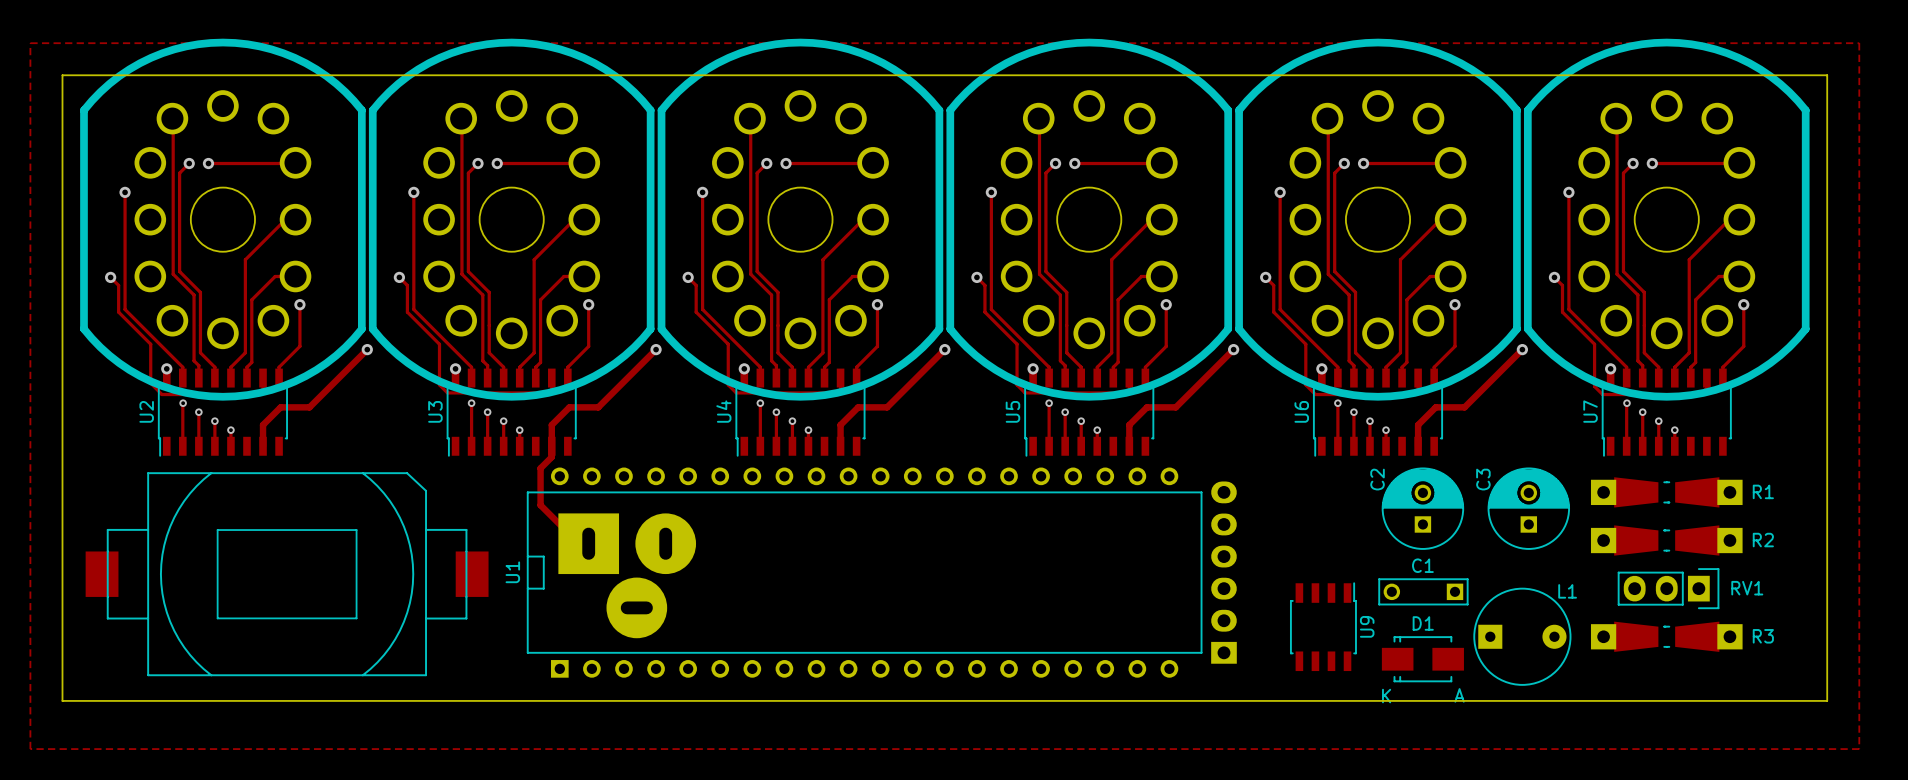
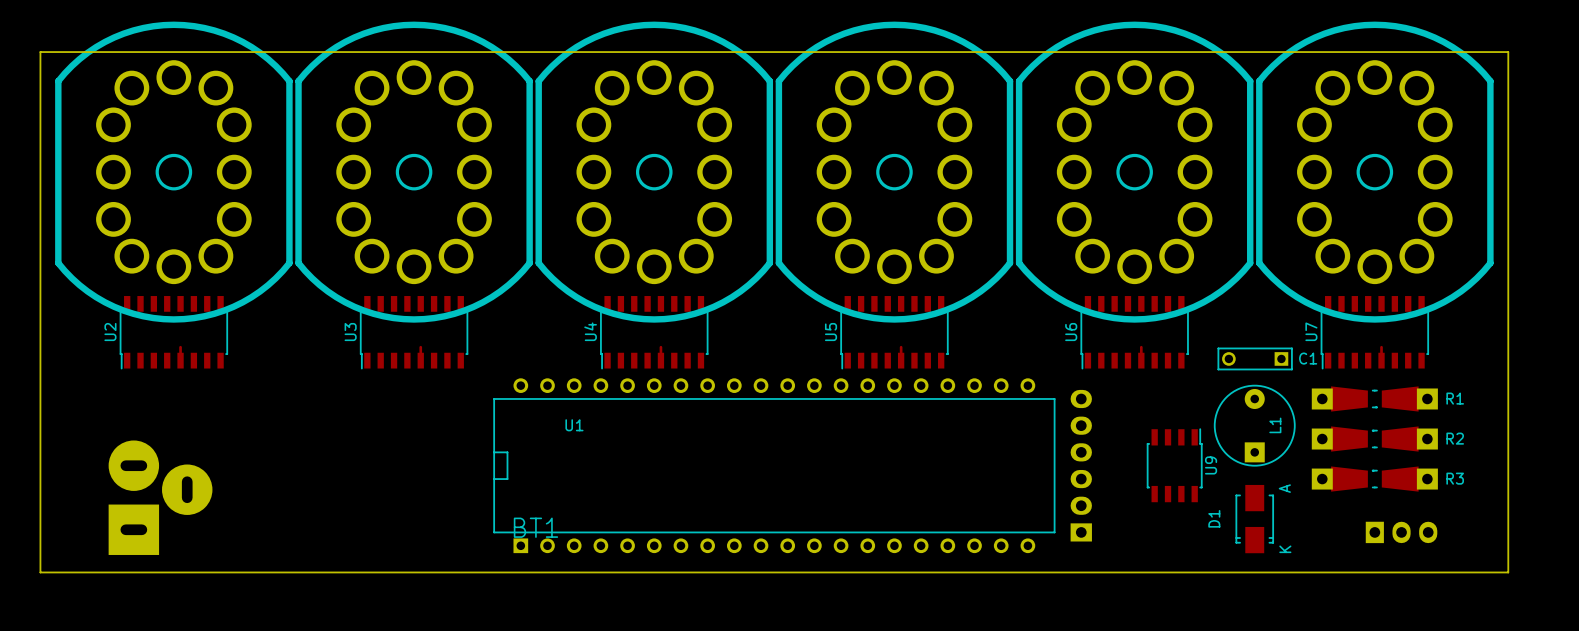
part footprint: [80, 38, 366, 401] -> [55, 21, 293, 323]
part footprint: [368, 38, 655, 401] -> [295, 21, 533, 323]
part footprint: [657, 38, 944, 401] -> [535, 21, 774, 323]
part footprint: [946, 38, 1233, 401] -> [775, 21, 1014, 323]
part footprint: [1235, 38, 1521, 401] -> [1015, 21, 1254, 323]
part footprint: [1523, 38, 1810, 401] -> [1256, 21, 1494, 323]
zone outline: (30, 43) (30, 749) (1859, 749) (1859, 43) (30, 43) -> none
track: (172, 118) (173, 274) (194, 295) (194, 360) (198, 365) (198, 378) -> none
track: (461, 118) (461, 274) (482, 295) (482, 360) (487, 365) (487, 378) -> none
track: (749, 118) (750, 274) (771, 295) (771, 360) (776, 365) (776, 378) -> none
track: (1038, 118) (1039, 274) (1060, 295) (1060, 360) (1065, 365) (1065, 378) -> none
track: (1327, 118) (1328, 274) (1349, 295) (1349, 360) (1353, 365) (1353, 378) -> none
track: (1616, 118) (1617, 274) (1637, 295) (1637, 360) (1642, 365) (1642, 378) -> none
track: (295, 162) (208, 163) -> none
track: (584, 162) (497, 163) -> none
track: (873, 162) (786, 163) -> none
track: (1161, 162) (1074, 163) -> none
track: (1450, 162) (1363, 163) -> none
track: (1739, 162) (1652, 163) -> none
track: (189, 163) (179, 173) (179, 271) (200, 292) (200, 352) (214, 367) (214, 378) -> none
via: (189, 163) -> none
via: (208, 163) -> none
track: (478, 163) (468, 173) (468, 271) (489, 292) (489, 352) (503, 367) (503, 378) -> none
via: (478, 163) -> none
via: (497, 163) -> none
track: (766, 163) (757, 173) (757, 271) (778, 292) (778, 352) (792, 367) (792, 378) -> none
via: (766, 163) -> none
via: (786, 163) -> none
track: (1055, 163) (1045, 173) (1045, 271) (1066, 292) (1066, 352) (1081, 367) (1081, 378) -> none
via: (1055, 163) -> none
via: (1074, 163) -> none
track: (1344, 163) (1334, 173) (1334, 271) (1355, 292) (1355, 352) (1369, 367) (1369, 378) -> none
via: (1344, 163) -> none
via: (1363, 163) -> none
track: (1633, 163) (1623, 173) (1623, 271) (1644, 292) (1644, 352) (1658, 367) (1658, 378) -> none
via: (1633, 163) -> none
via: (1652, 163) -> none
track: (125, 192) (125, 309) (182, 367) (182, 378) -> none
via: (125, 192) -> none
track: (413, 192) (413, 309) (471, 367) (471, 378) -> none
via: (413, 192) -> none
track: (702, 192) (702, 309) (760, 367) (760, 378) -> none
via: (702, 192) -> none
track: (991, 192) (991, 309) (1049, 367) (1049, 378) -> none
via: (991, 192) -> none
track: (1280, 192) (1280, 309) (1337, 367) (1337, 378) -> none
via: (1280, 192) -> none
track: (1568, 192) (1568, 309) (1626, 367) (1626, 378) -> none
via: (1568, 192) -> none
track: (295, 219) (285, 219) (245, 259) (245, 352) (230, 367) (230, 378) -> none
track: (584, 219) (574, 219) (534, 259) (534, 352) (519, 367) (519, 378) -> none
track: (873, 219) (863, 219) (822, 259) (822, 352) (808, 367) (808, 378) -> none
track: (1161, 219) (1151, 219) (1111, 259) (1111, 352) (1097, 367) (1097, 378) -> none
track: (1450, 219) (1440, 219) (1400, 259) (1400, 352) (1386, 367) (1386, 378) -> none
track: (1739, 219) (1729, 219) (1689, 259) (1689, 352) (1674, 367) (1674, 378) -> none
track: (295, 276) (275, 276) (251, 299) (251, 362) (246, 367) (246, 378) -> none
track: (584, 276) (563, 276) (540, 299) (540, 362) (535, 367) (535, 378) -> none
track: (873, 276) (852, 276) (829, 299) (829, 362) (824, 367) (824, 378) -> none
track: (1161, 276) (1141, 276) (1118, 299) (1118, 362) (1113, 367) (1113, 378) -> none
track: (1450, 276) (1430, 276) (1406, 299) (1406, 362) (1402, 367) (1402, 378) -> none
track: (1739, 276) (1719, 276) (1695, 299) (1695, 362) (1690, 367) (1690, 378) -> none
track: (110, 277) (118, 285) (118, 312) (150, 344) (150, 383) (161, 394) (258, 394) (263, 389) (263, 378) -> none
via: (110, 277) -> none
track: (399, 277) (407, 285) (407, 312) (439, 344) (439, 384) (447, 392) (548, 392) (551, 389) (551, 378) -> none
via: (399, 277) -> none
track: (688, 277) (696, 285) (696, 312) (728, 344) (728, 384) (736, 392) (837, 392) (840, 389) (840, 378) -> none
via: (688, 277) -> none
track: (976, 277) (984, 285) (984, 312) (1017, 344) (1017, 384) (1025, 392) (1126, 392) (1129, 389) (1129, 378) -> none
via: (976, 277) -> none
track: (1265, 277) (1273, 285) (1273, 312) (1305, 344) (1305, 384) (1315, 394) (1413, 394) (1418, 389) (1418, 378) -> none
via: (1265, 277) -> none
track: (1554, 277) (1562, 285) (1562, 312) (1594, 344) (1594, 386) (1602, 394) (1700, 394) (1706, 388) (1706, 378) -> none
via: (1554, 277) -> none
track: (299, 304) (299, 346) (279, 367) (279, 378) -> none
via: (299, 304) -> none
track: (588, 304) (588, 346) (567, 367) (567, 378) -> none
via: (588, 304) -> none
track: (877, 304) (877, 346) (856, 367) (856, 378) -> none
via: (877, 304) -> none
track: (1166, 304) (1166, 346) (1145, 367) (1145, 378) -> none
via: (1166, 304) -> none
track: (1455, 304) (1455, 346) (1434, 367) (1434, 378) -> none
via: (1455, 304) -> none
track: (1743, 304) (1743, 346) (1722, 367) (1722, 378) -> none
via: (1743, 304) -> none
track: (367, 349) (309, 407) (280, 407) (263, 425) (263, 446) -> none
via: (367, 349) -> none
track: (656, 349) (598, 407) (569, 407) (551, 425) (551, 457) (540, 468) (540, 505) (587, 551) -> none
via: (656, 349) -> none
track: (944, 349) (887, 407) (858, 407) (840, 425) (840, 446) -> none
via: (944, 349) -> none
track: (1233, 349) (1175, 407) (1146, 407) (1129, 425) (1129, 446) -> none
via: (1233, 349) -> none
track: (1522, 349) (1464, 407) (1435, 407) (1418, 425) (1418, 446) -> none
via: (1522, 349) -> none
via: (166, 368) -> none
via: (455, 368) -> none
via: (744, 368) -> none
via: (1033, 368) -> none
via: (1321, 368) -> none
via: (1610, 368) -> none
track: (183, 403) (182, 446) -> none
via: (183, 403) -> none
track: (471, 403) (471, 446) -> none
via: (471, 403) -> none
track: (760, 403) (760, 446) -> none
via: (760, 403) -> none
track: (1049, 403) (1049, 446) -> none
via: (1049, 403) -> none
track: (1337, 403) (1337, 446) -> none
via: (1337, 403) -> none
track: (1626, 403) (1626, 446) -> none
via: (1626, 403) -> none
track: (198, 412) (198, 446) -> none
via: (198, 412) -> none
track: (487, 412) (487, 446) -> none
via: (487, 412) -> none
track: (776, 412) (776, 446) -> none
via: (776, 412) -> none
track: (1065, 412) (1065, 446) -> none
via: (1065, 412) -> none
track: (1353, 412) (1353, 446) -> none
via: (1353, 412) -> none
track: (1642, 412) (1642, 446) -> none
via: (1642, 412) -> none
track: (214, 421) (214, 446) -> none
via: (214, 421) -> none
track: (503, 421) (503, 446) -> none
via: (503, 421) -> none
track: (792, 421) (792, 446) -> none
via: (792, 421) -> none
track: (1081, 421) (1081, 446) -> none
via: (1081, 421) -> none
track: (1369, 421) (1369, 446) -> none
via: (1369, 421) -> none
track: (1658, 421) (1658, 446) -> none
via: (1658, 421) -> none
via: (230, 430) -> none
via: (519, 430) -> none
via: (808, 430) -> none
via: (1097, 430) -> none
via: (1386, 430) -> none
via: (1674, 430) -> none
C2: (1422, 508) -> none
C3: (1528, 508) -> none
C1 name position: C1 (1422, 565) -> C1 (1308, 358)
U1 name rotation: 0° (512, 572) -> 90° clockwise (574, 425)
U1 name position: U1 (512, 572) -> U1 (574, 425)
U1 position: (864, 572) -> (774, 465)
part position: (1223, 572) -> (1081, 465)
part: (287, 574) -> none
part: (627, 575) -> none
RV1 side: top (1668, 588) -> bottom (1401, 532)
C1 position: (1423, 591) -> (1255, 358)
L1 name position: L1 (1567, 591) -> L1 (1275, 425)
part: none -> (160, 497)
U9 position: (1323, 626) -> (1174, 465)
L1 rotation: 0° (1522, 636) -> 90° counterclockwise (1254, 425)
L1 position: (1522, 636) -> (1254, 425)
R3 position: (1666, 636) -> (1374, 479)
BT1: none -> (535, 527)
D1 rotation: 0° (1422, 659) -> 90° counterclockwise (1254, 519)
D1 position: (1422, 659) -> (1254, 519)

